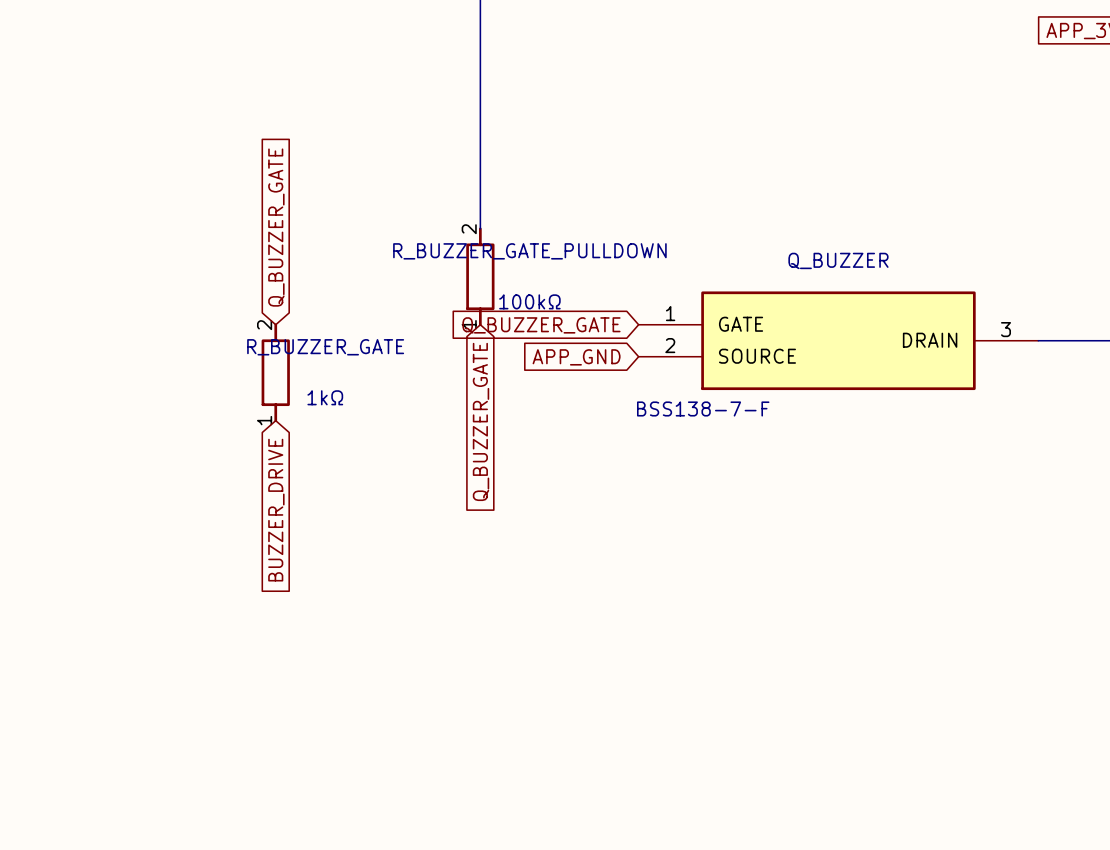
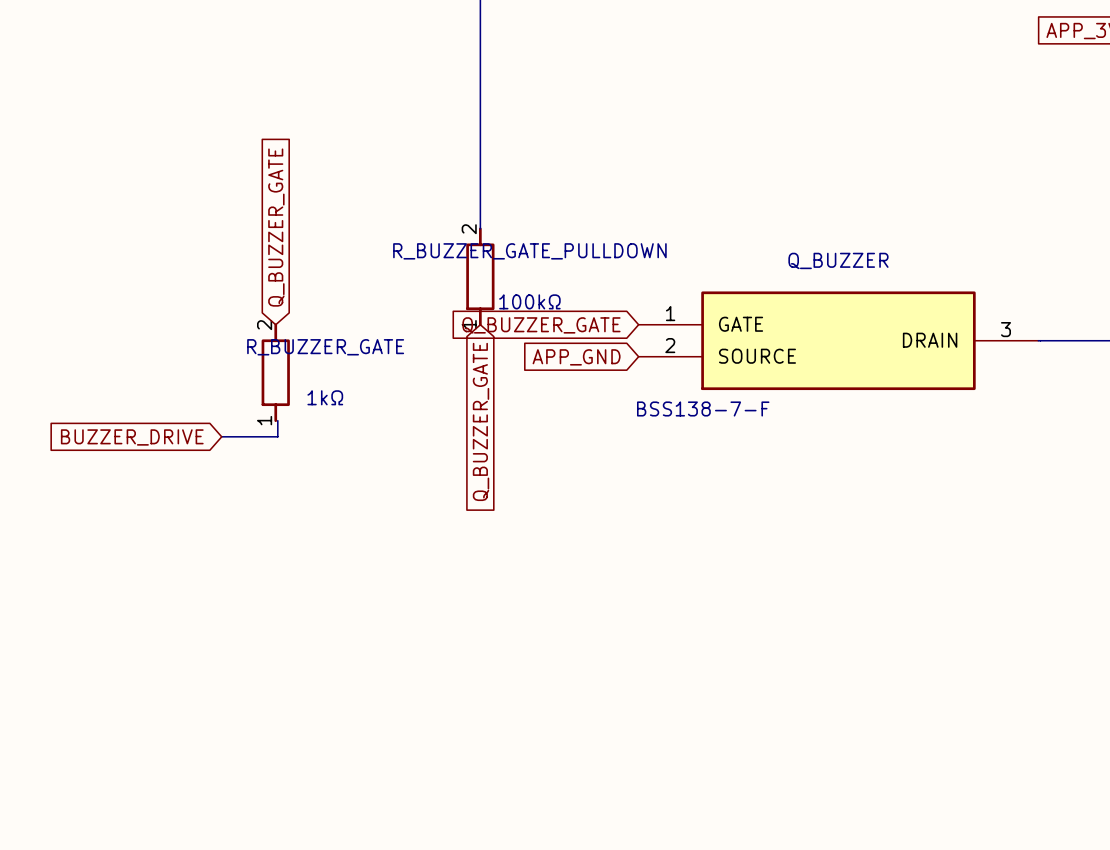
wire: none -> (277, 420) (277, 436) (221, 436)
global label rotation: 0° (276, 510) -> 90° clockwise (132, 437)

